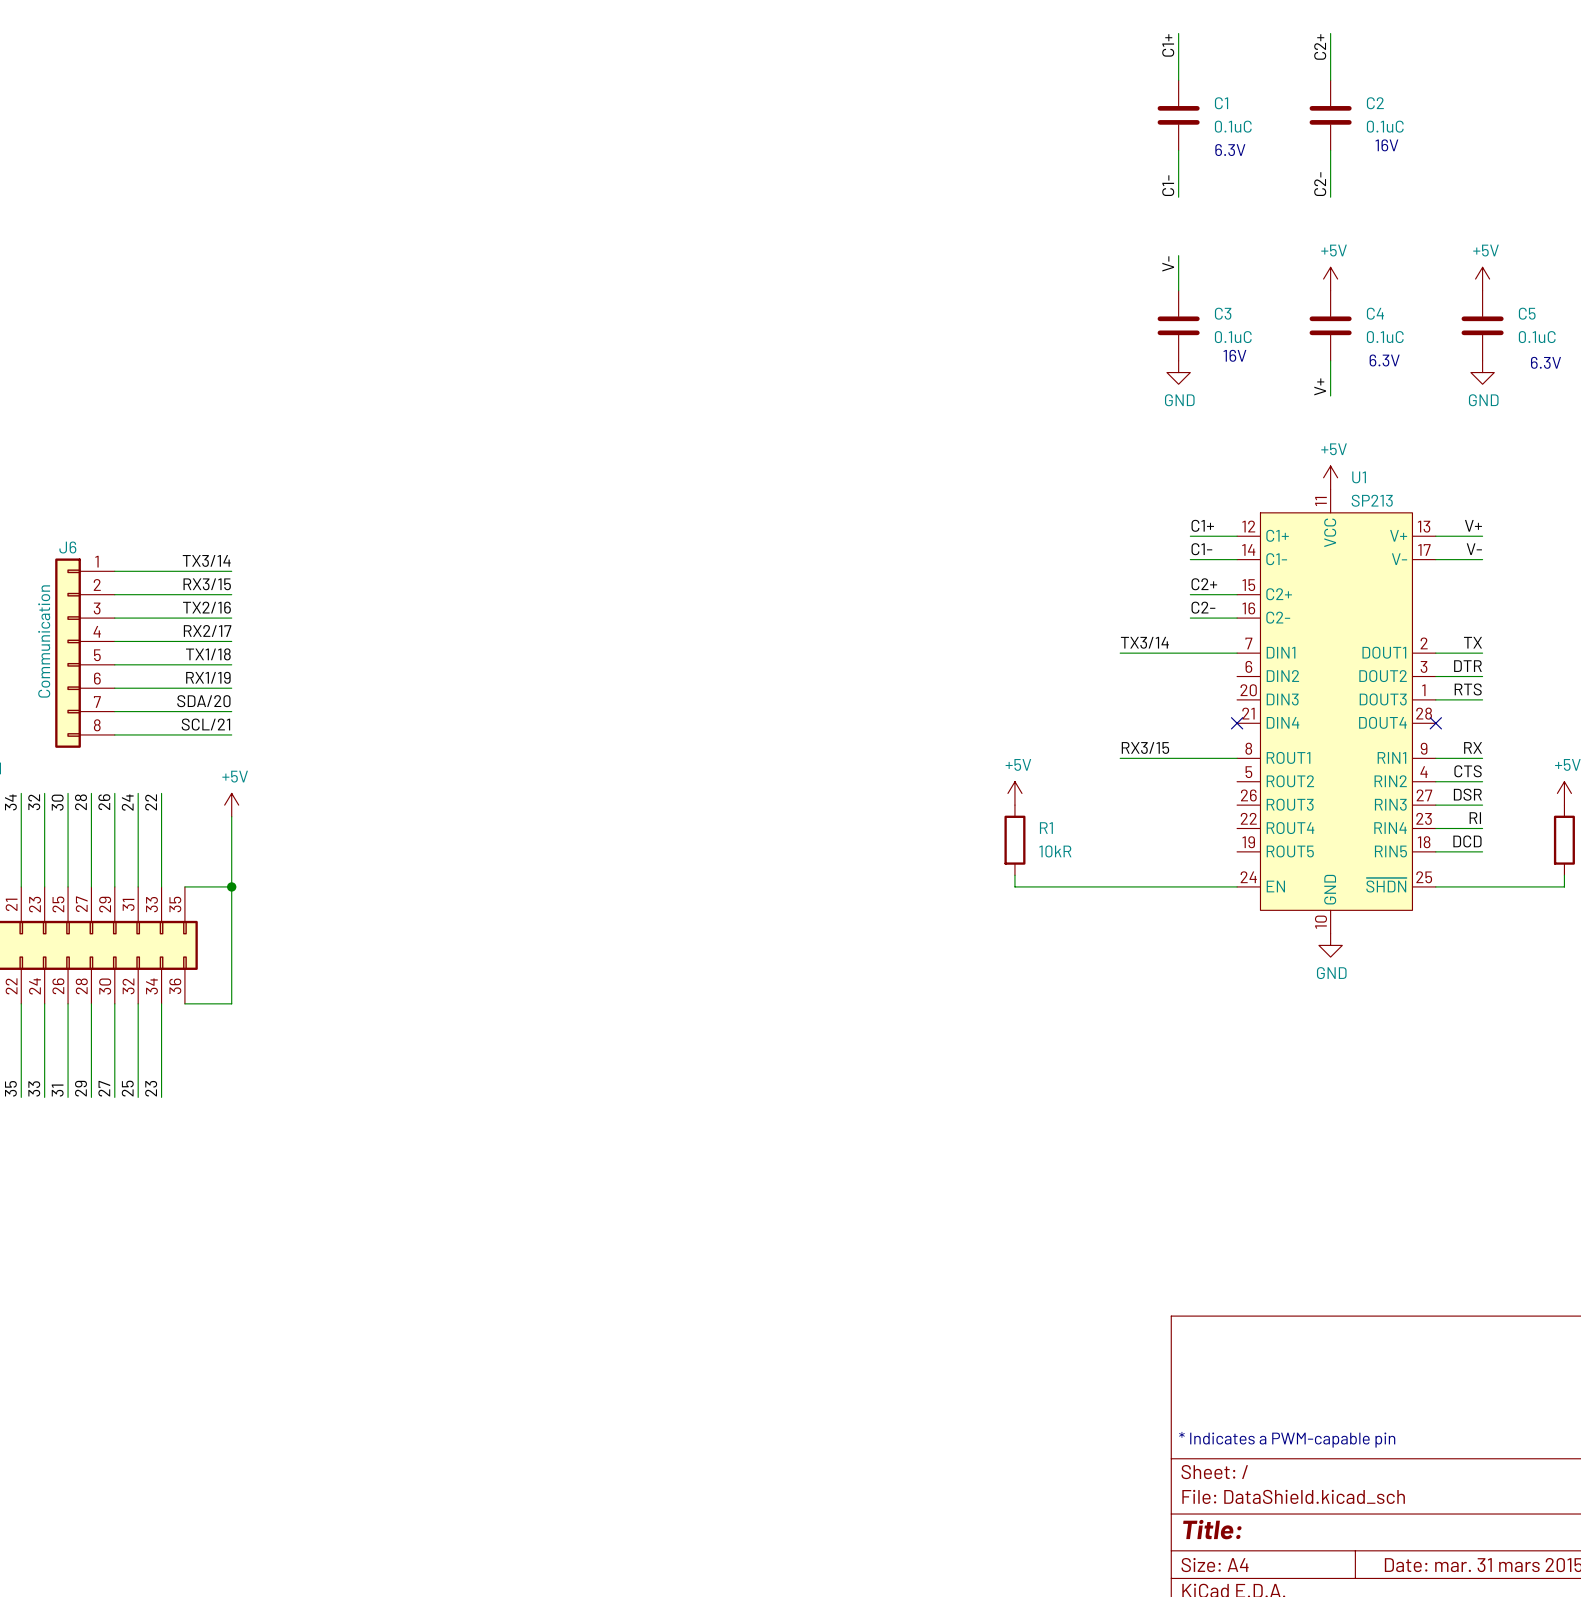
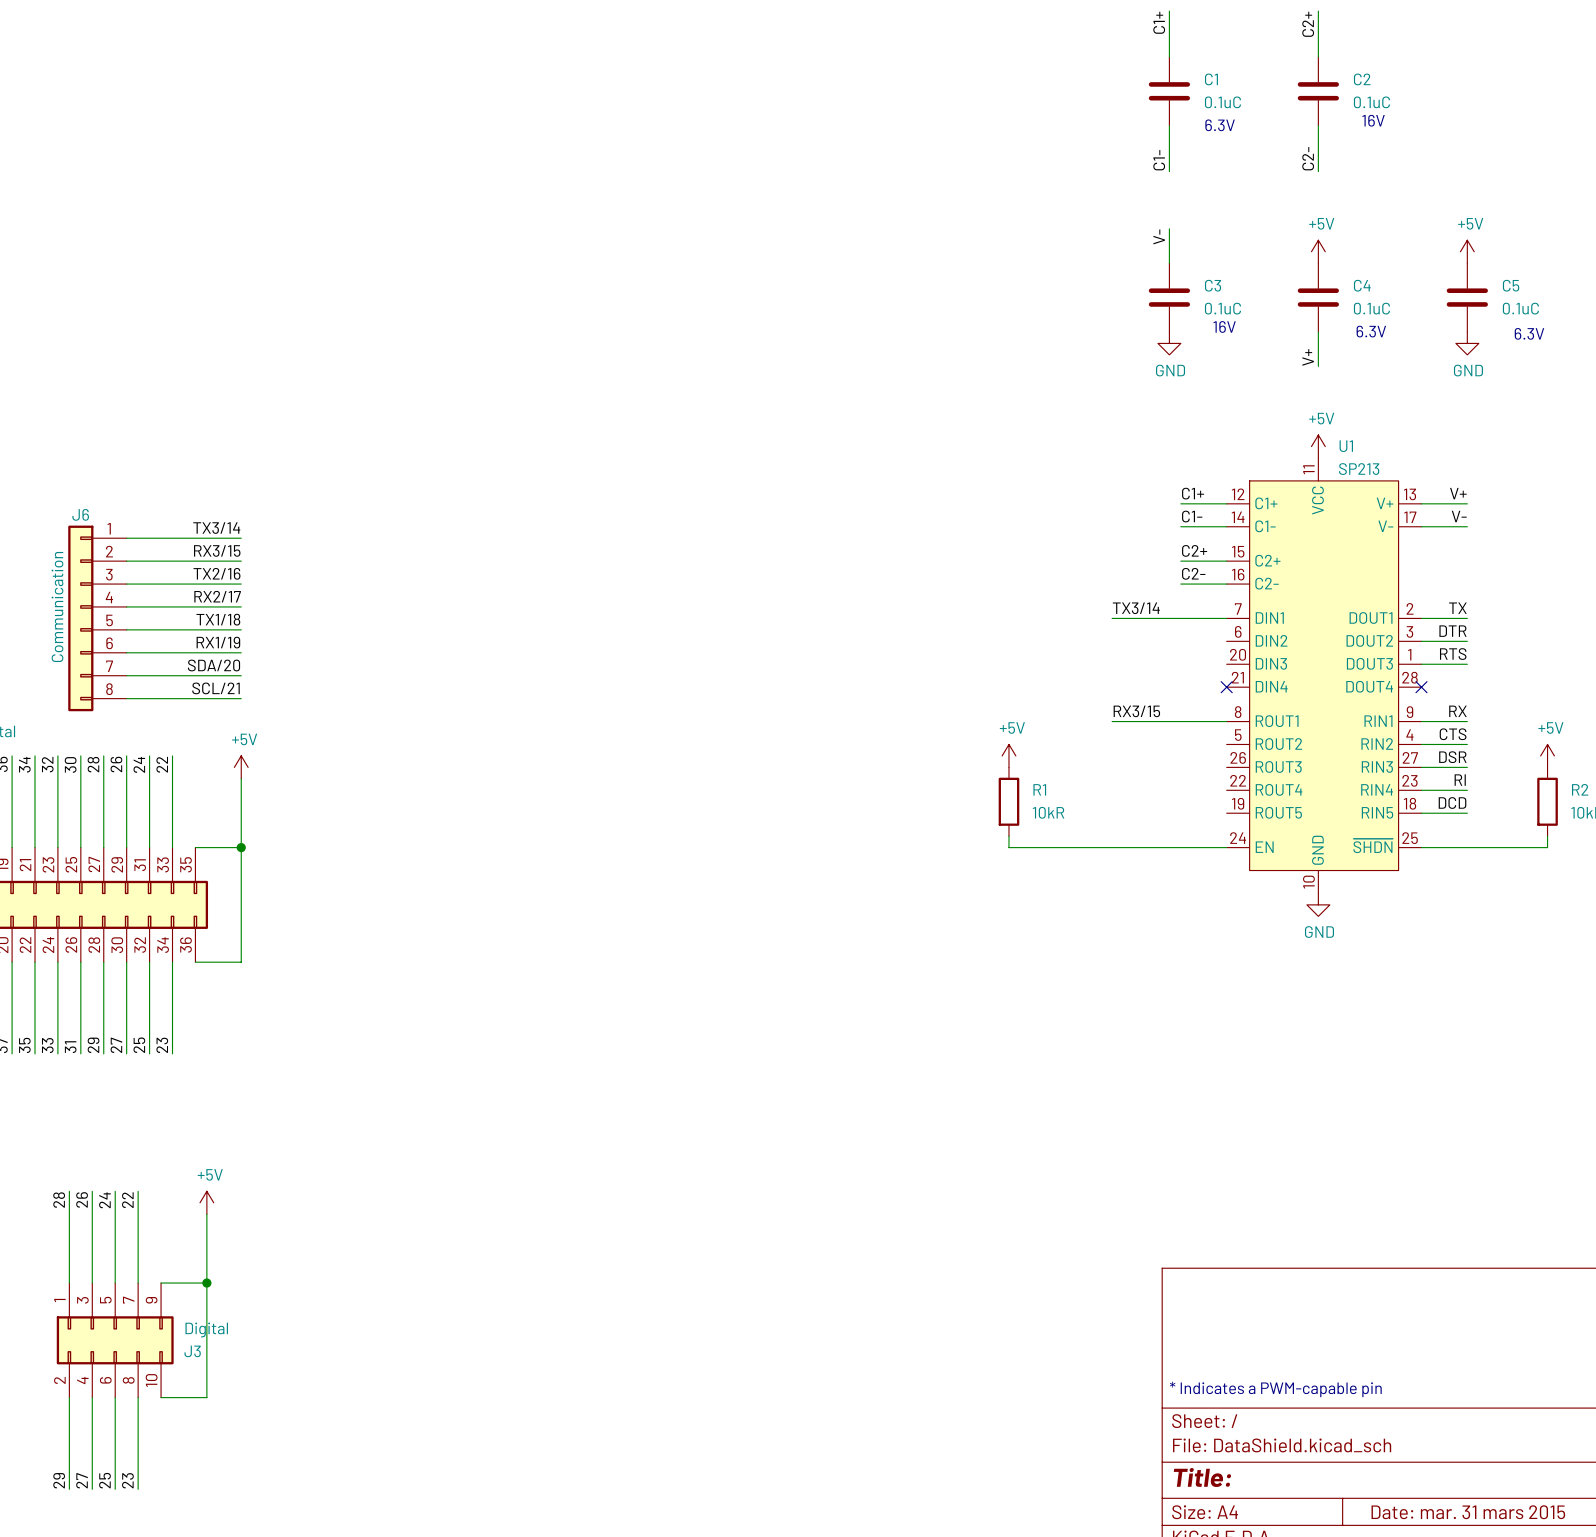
wire: none -> (69, 1191) (69, 1283)
wire: none -> (92, 1191) (92, 1283)
wire: none -> (115, 1191) (115, 1283)
wire: none -> (138, 1191) (138, 1283)
label: none -> 28 (59, 1200)
label: none -> 26 (82, 1199)
label: none -> 24 (104, 1200)
label: none -> 22 (127, 1200)
power symbol: none -> +5V (206, 1202)
wire: none -> (206, 1214) (206, 1397) (161, 1397)
wire: none -> (161, 1283) (206, 1283)
junction: none -> (206, 1283)
J3: none -> Digital (115, 1340)
wire: none -> (69, 1397) (69, 1489)
wire: none -> (92, 1397) (92, 1489)
wire: none -> (115, 1397) (115, 1489)
wire: none -> (138, 1397) (138, 1489)
label: none -> 29 (59, 1480)
label: none -> 27 (82, 1480)
label: none -> 25 (104, 1480)
label: none -> 23 (127, 1480)

